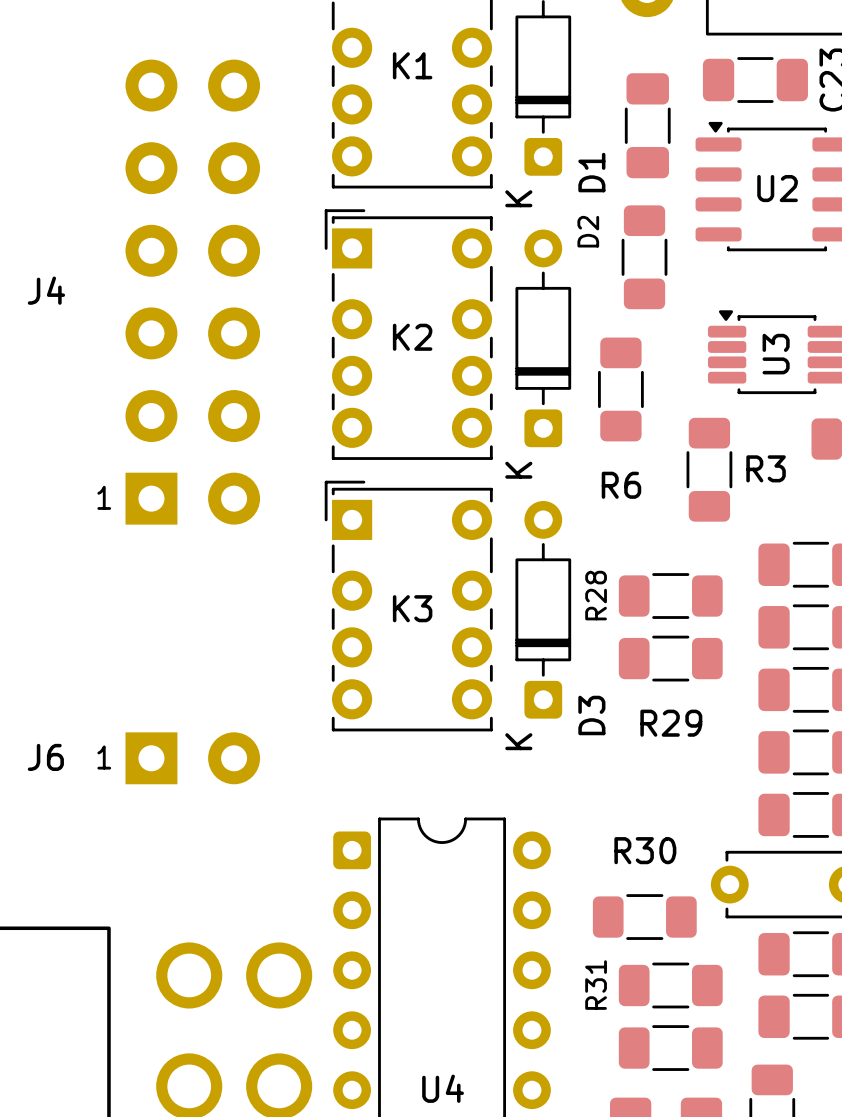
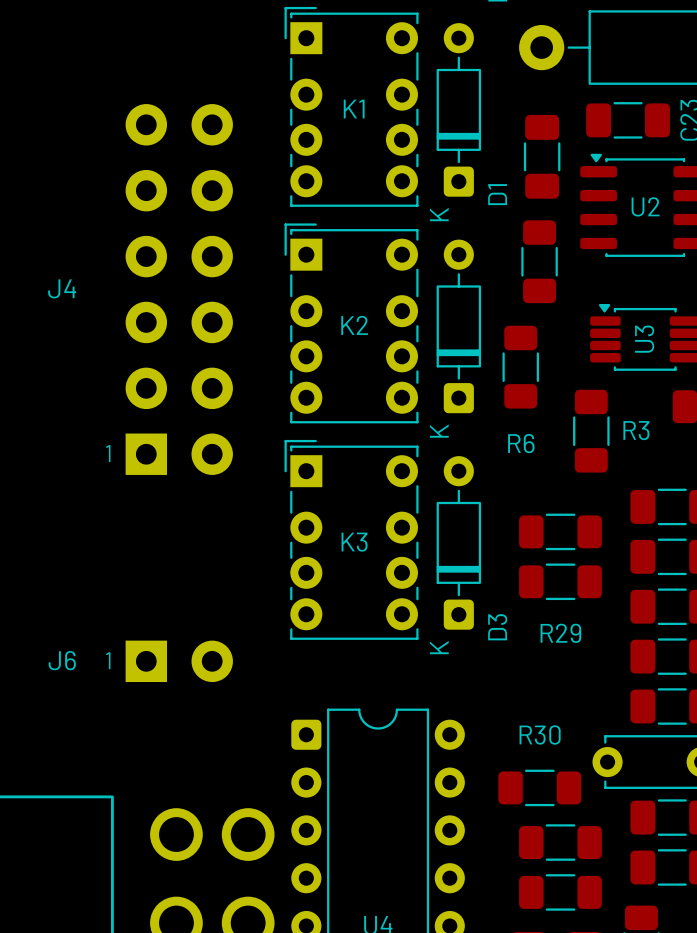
D2 name: D2 (588, 231) -> none
R28 name: R28 (596, 595) -> none
R31 name: R31 (596, 985) -> none

